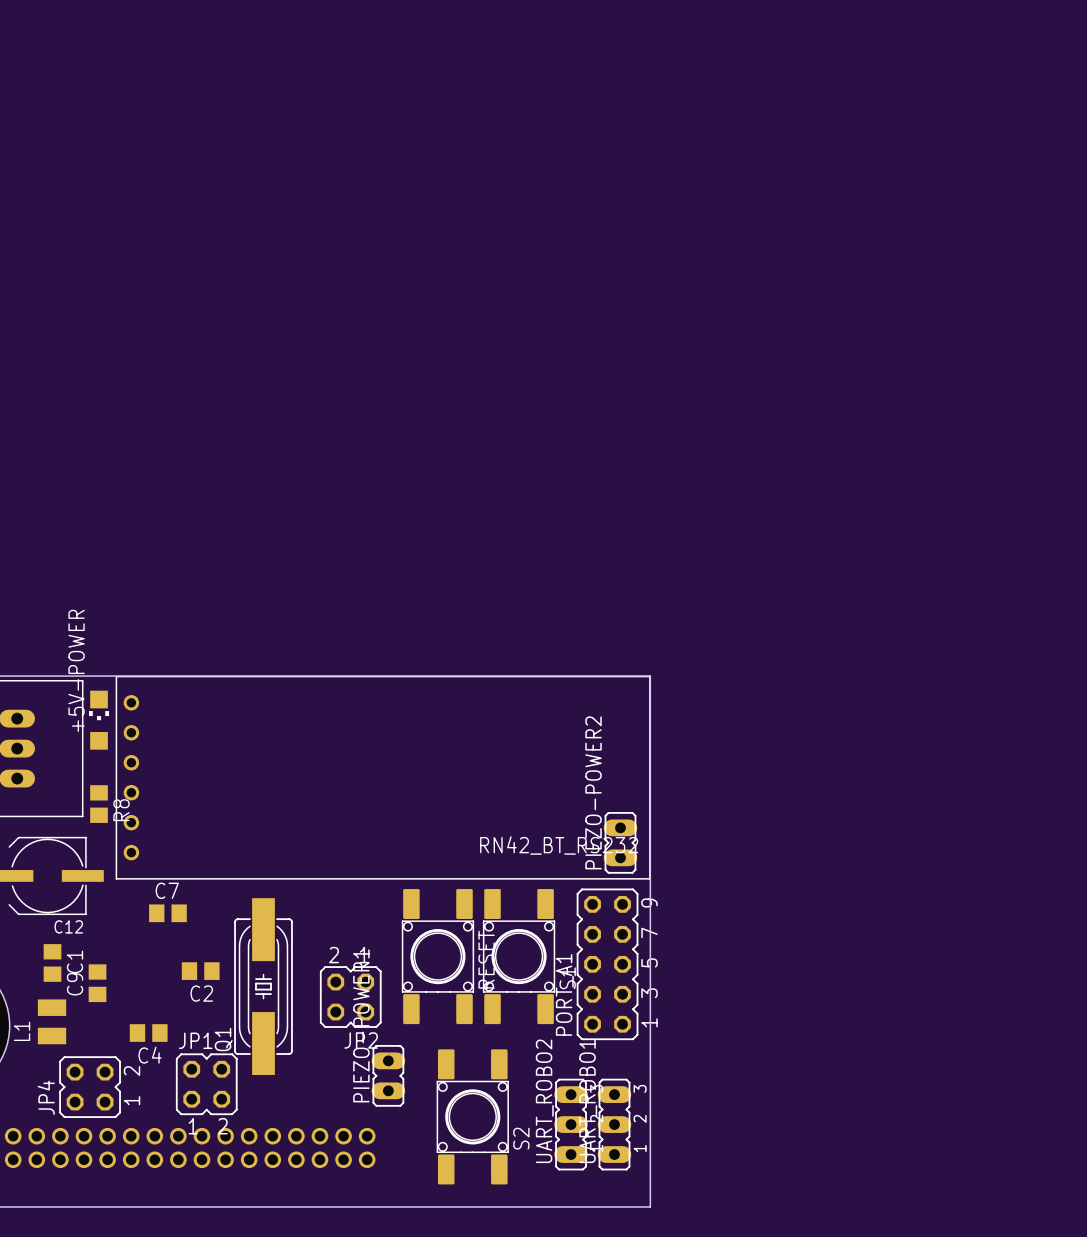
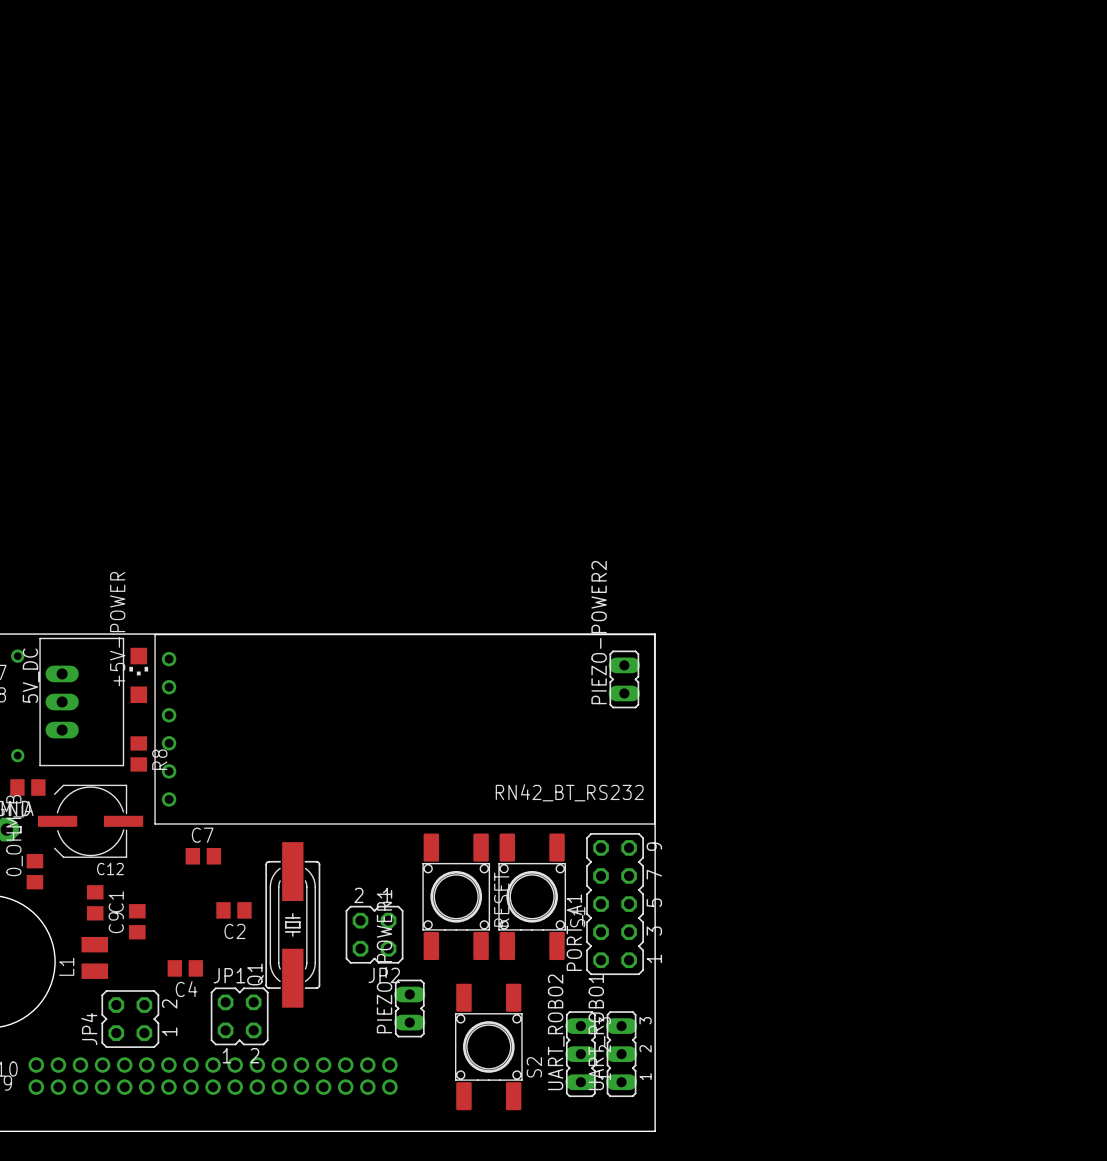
PIEZO-POWER2 position: (620, 842) -> (624, 679)

